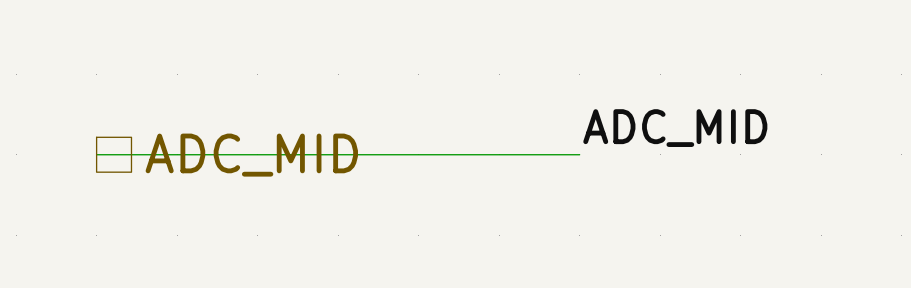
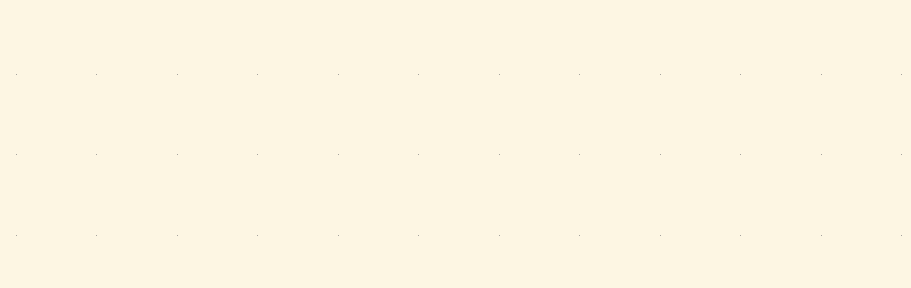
label: ADC_MID (675, 128) -> none
wire: (96, 154) (579, 154) -> none
hierarchical label: ADC_MID (251, 155) -> none

